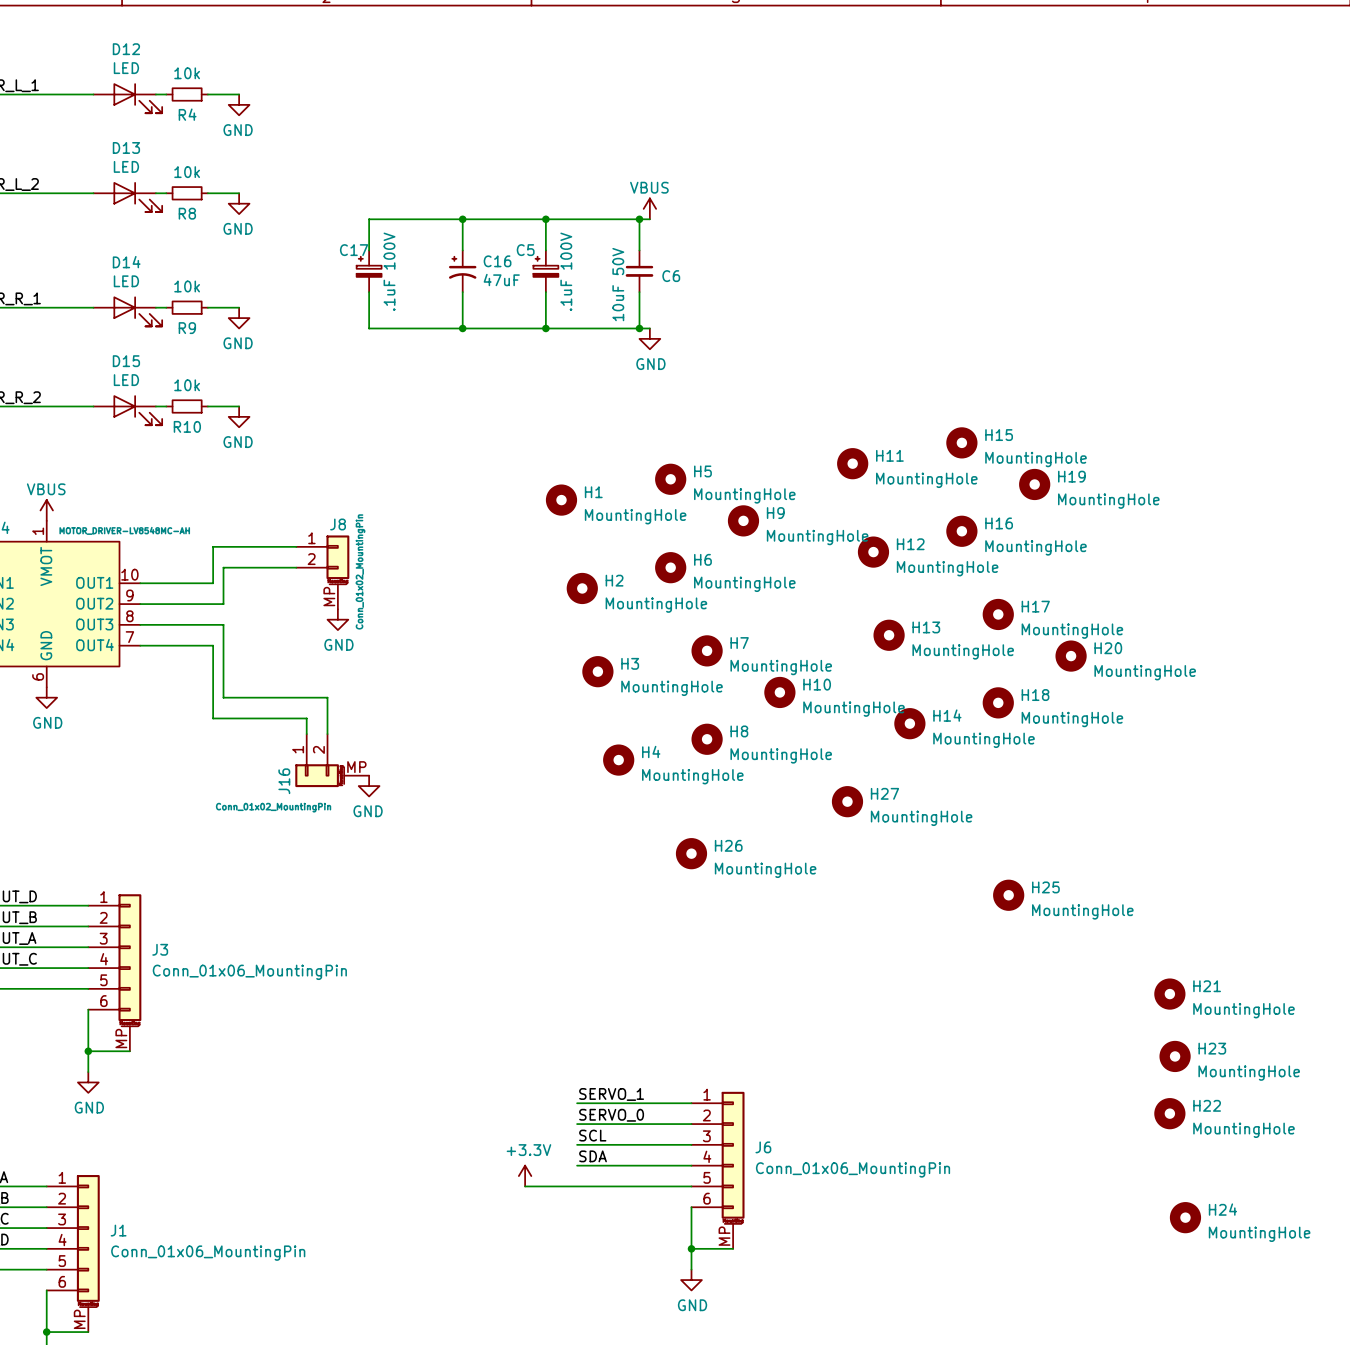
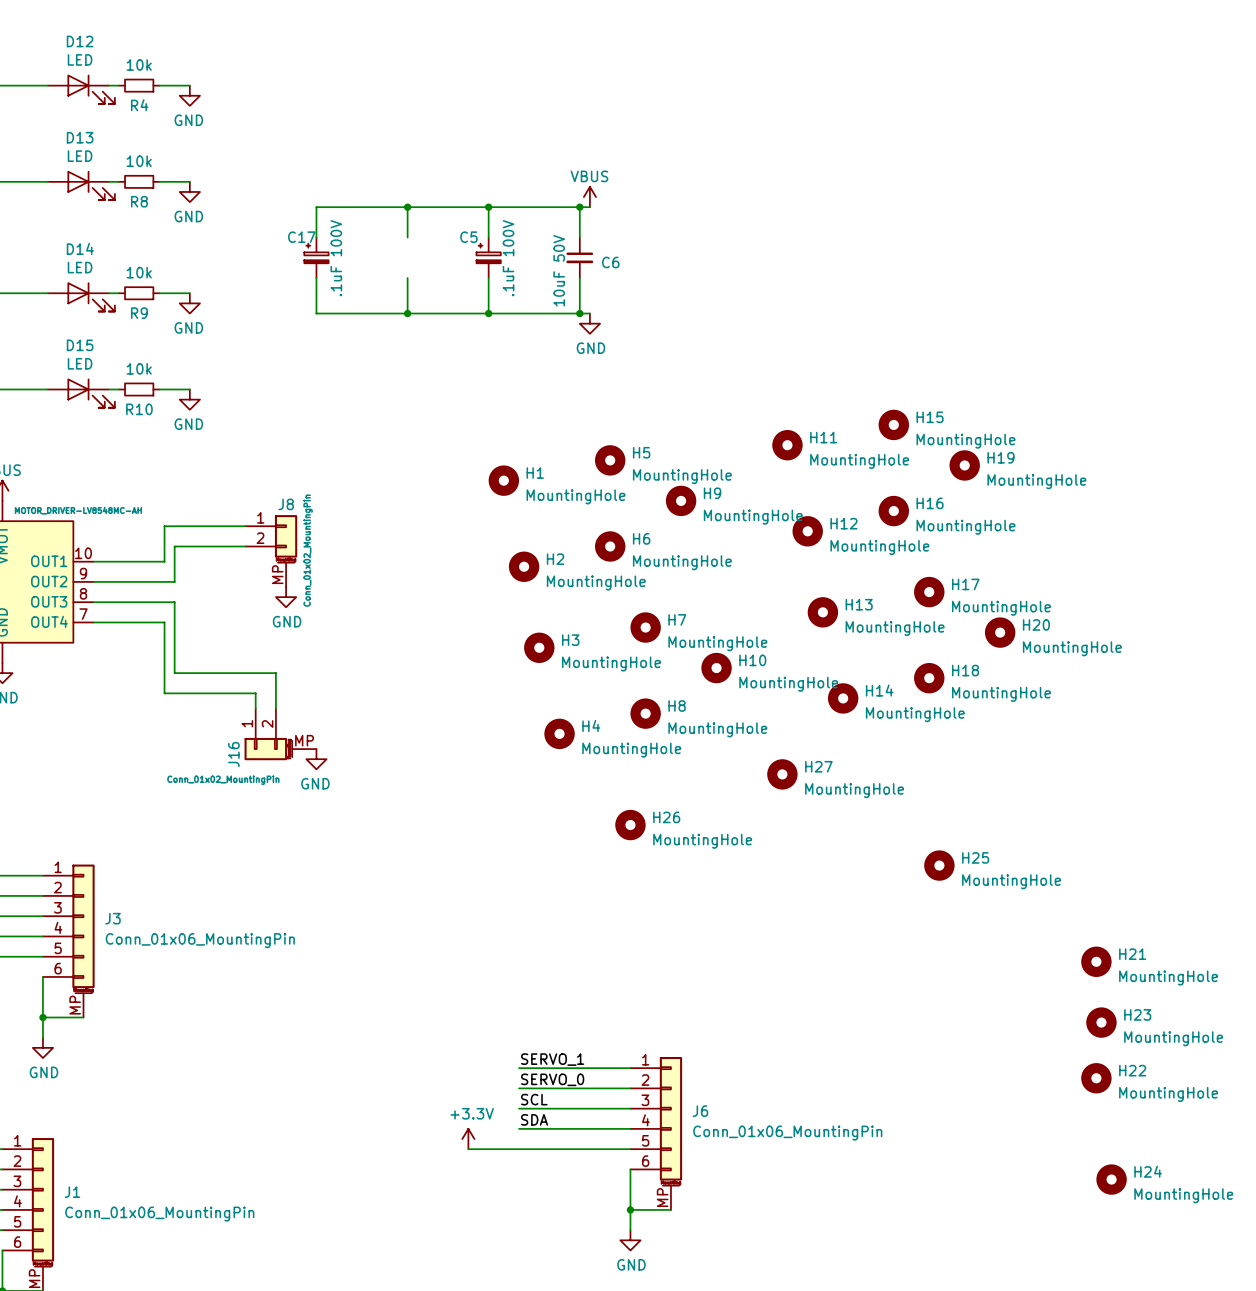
C16: 47uF (462, 271) -> none

